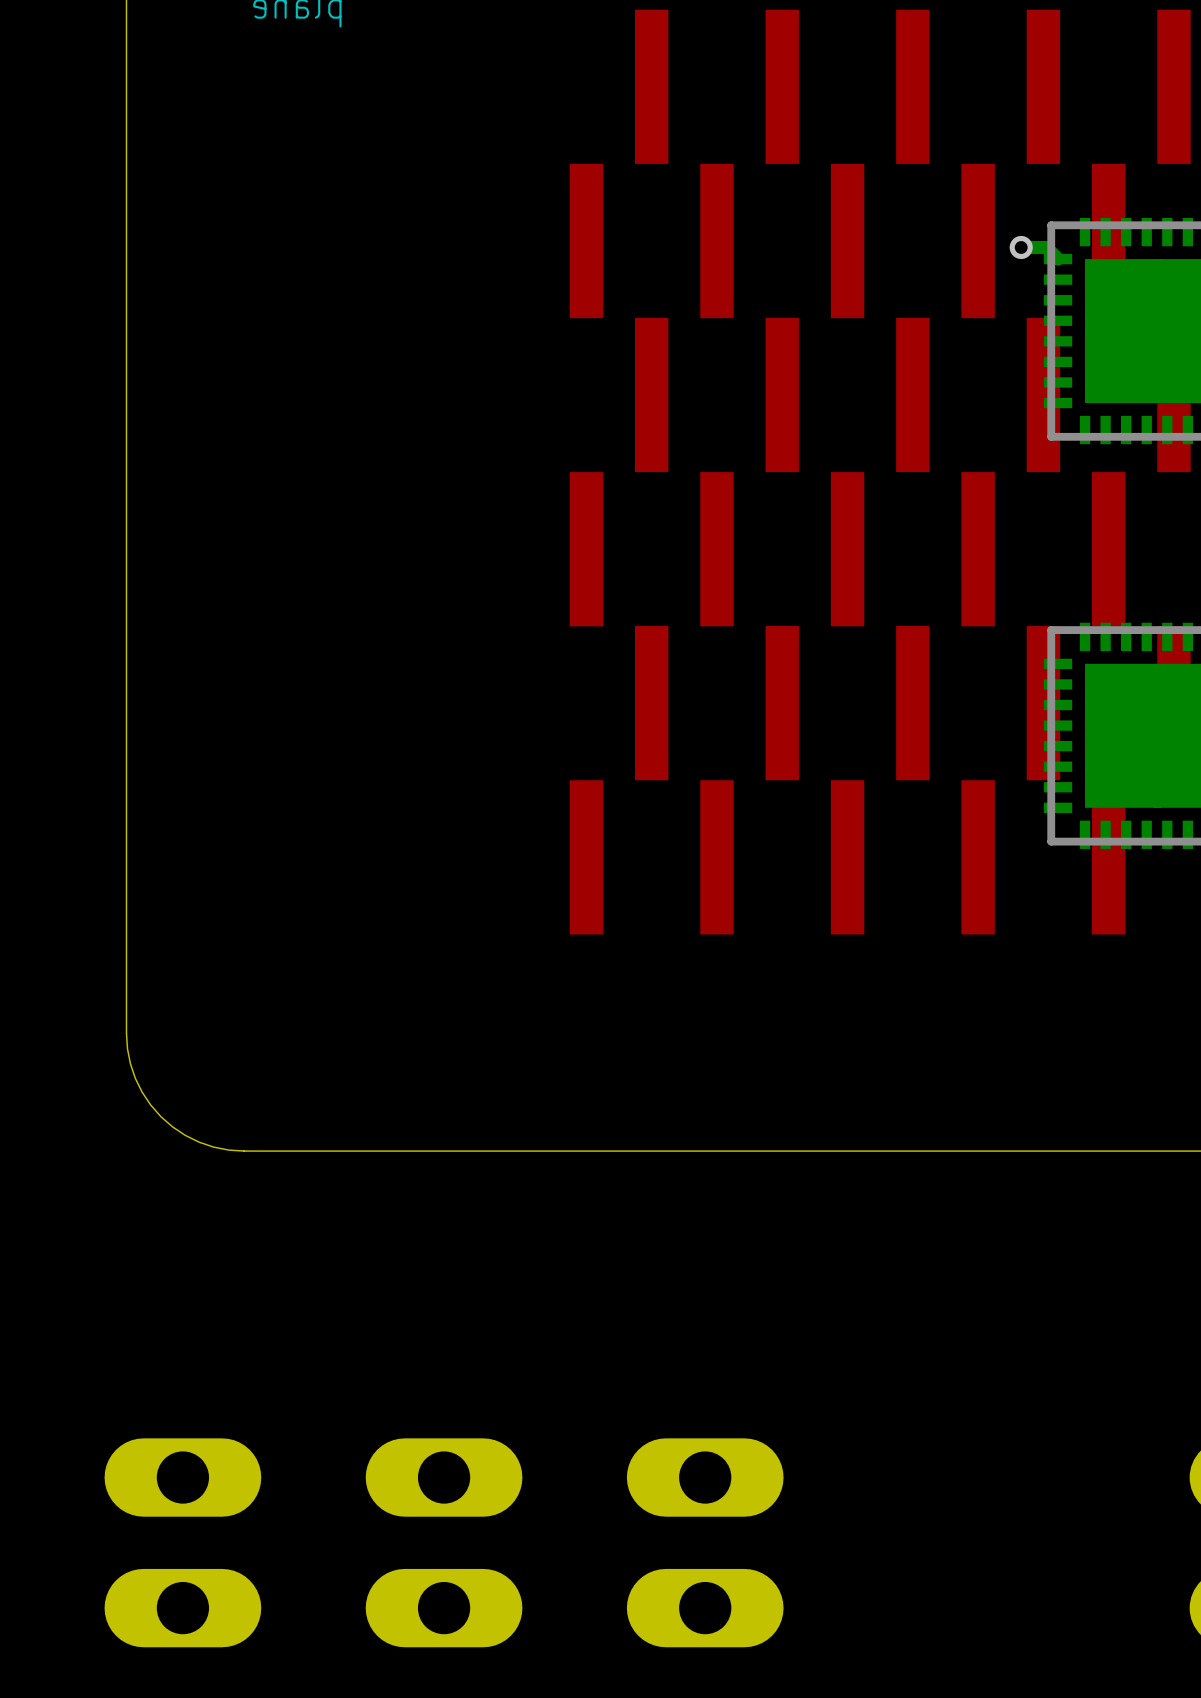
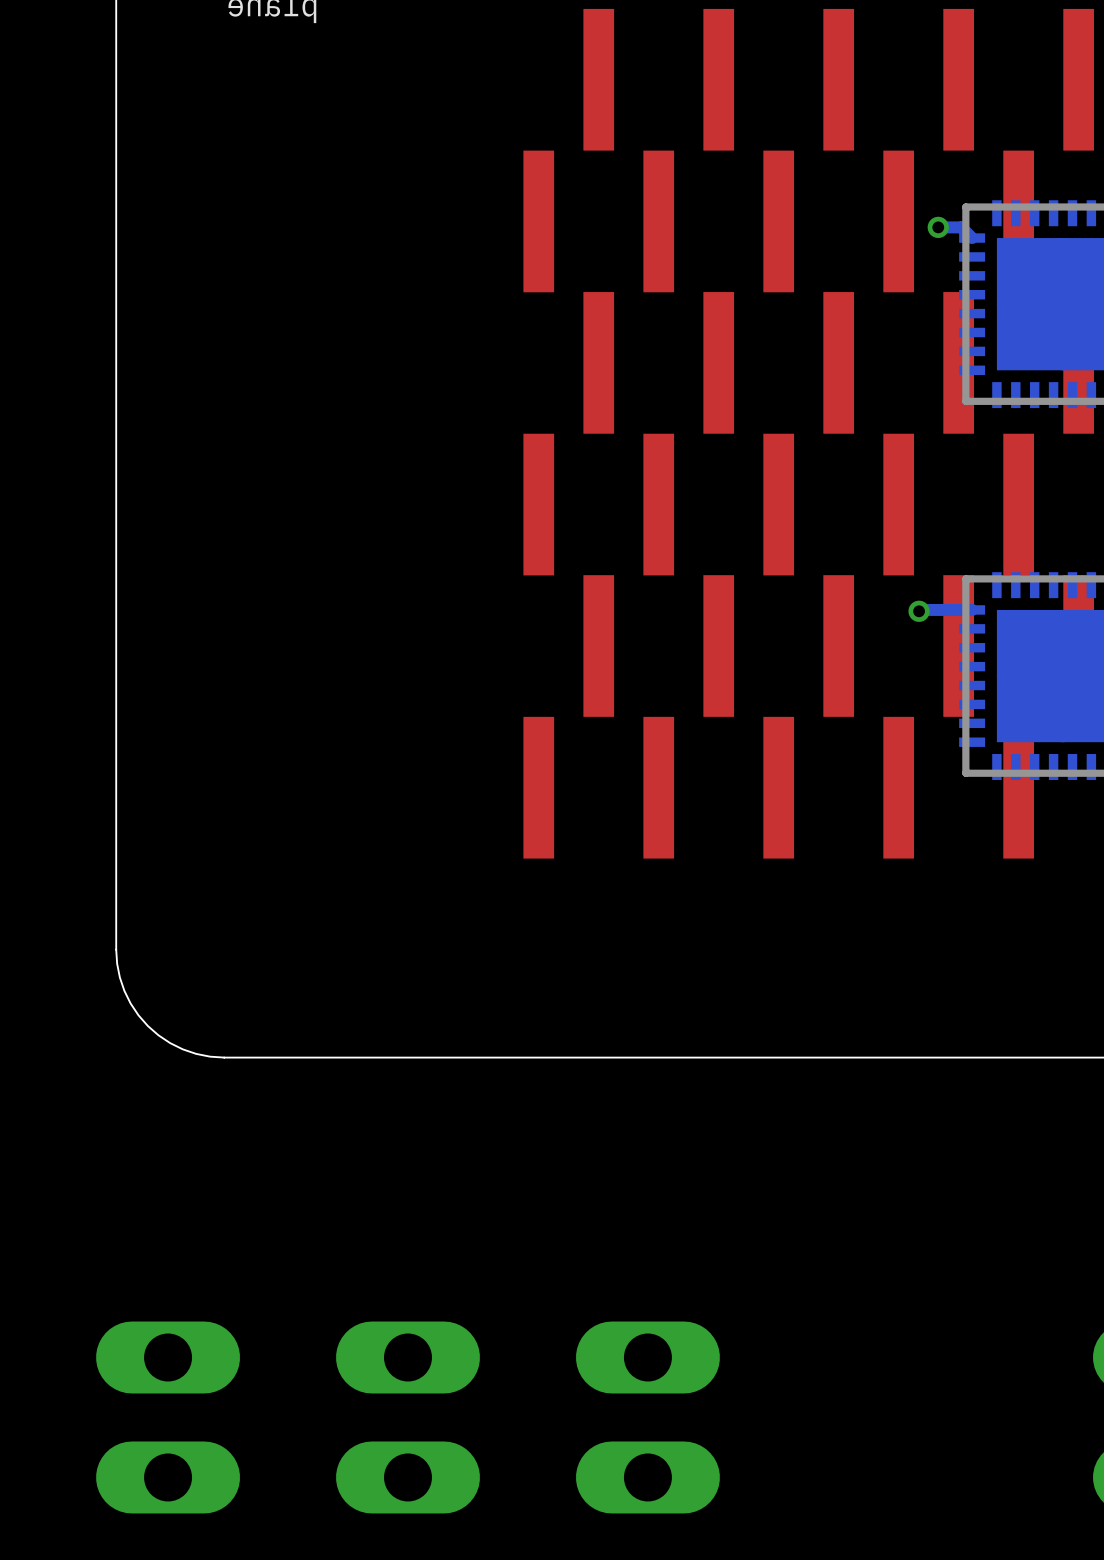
bottom track: none -> (972, 609) (919, 611)
via: none -> (919, 611)

